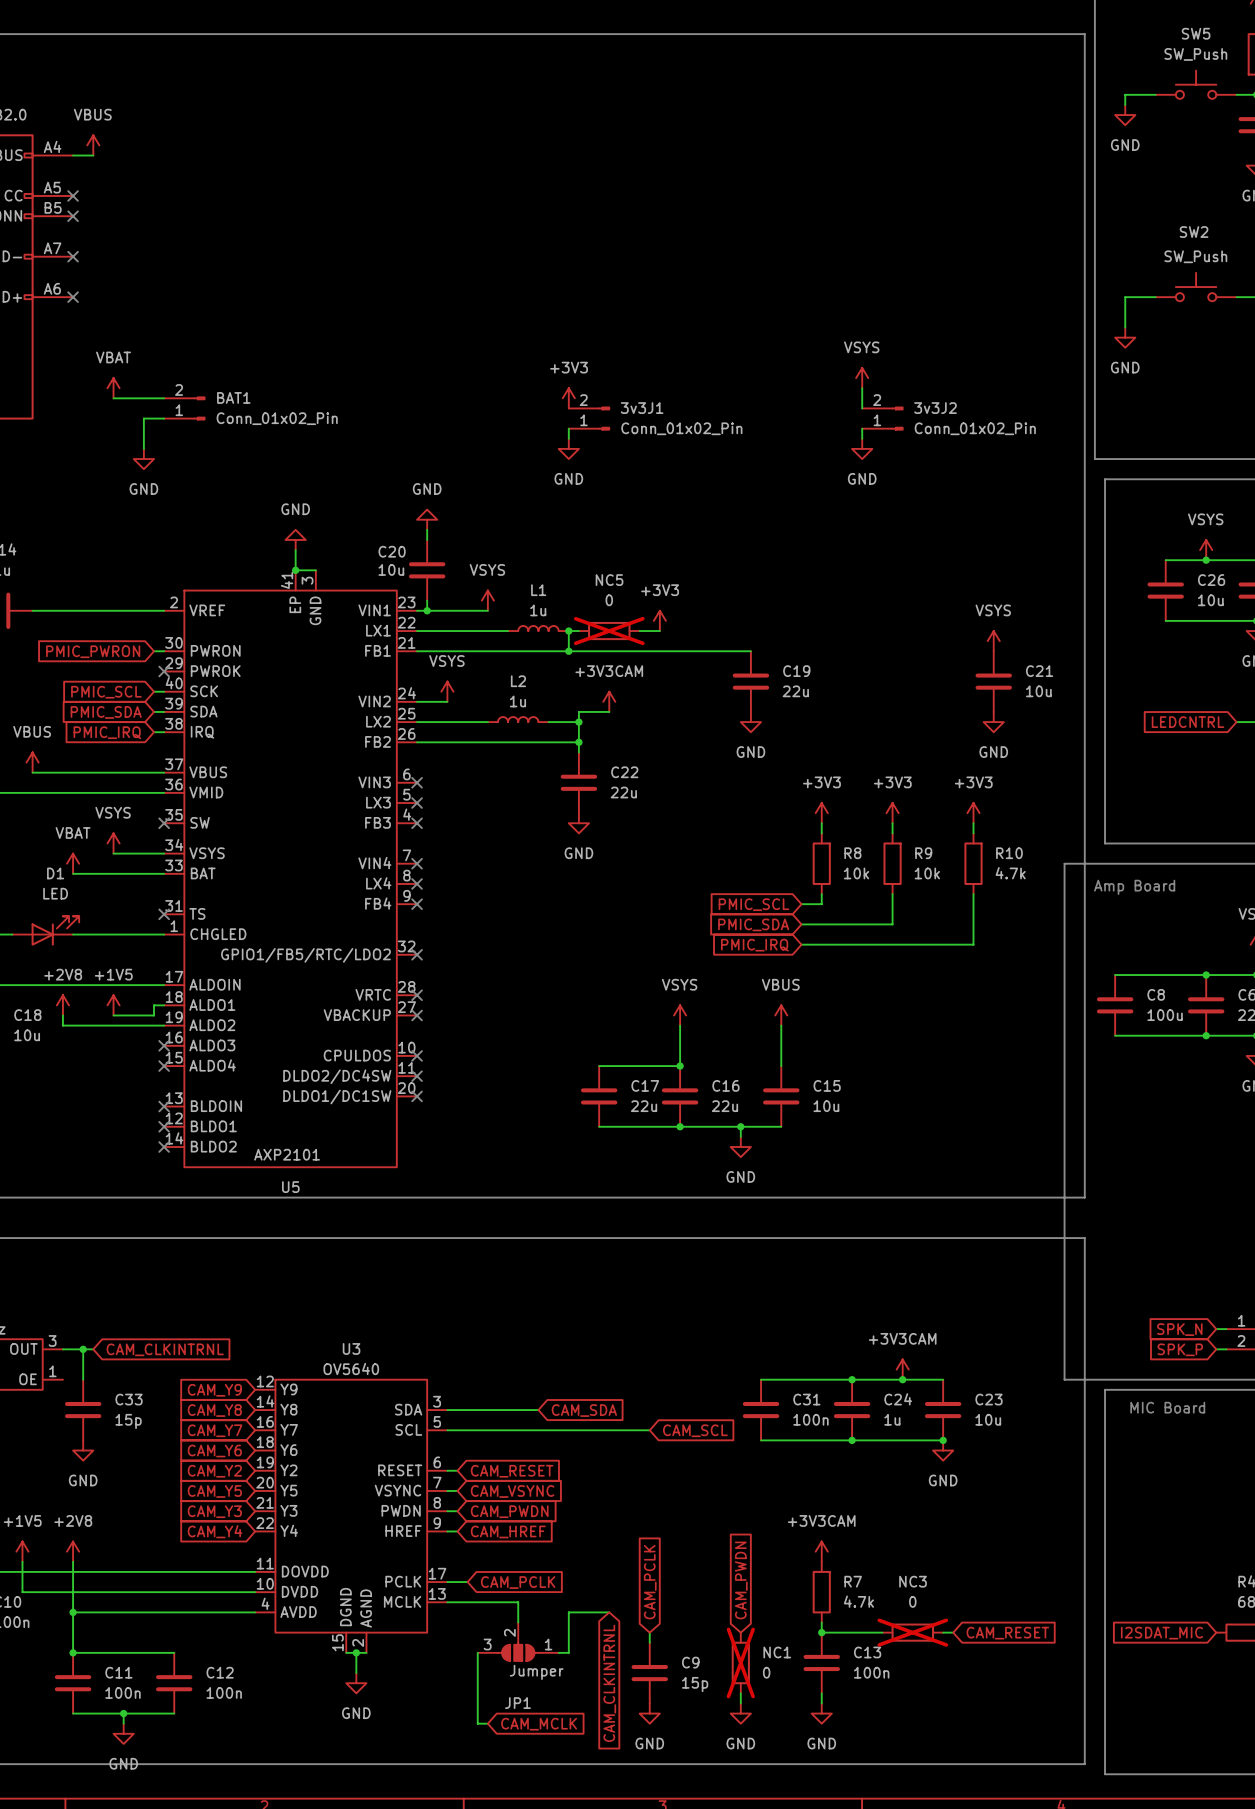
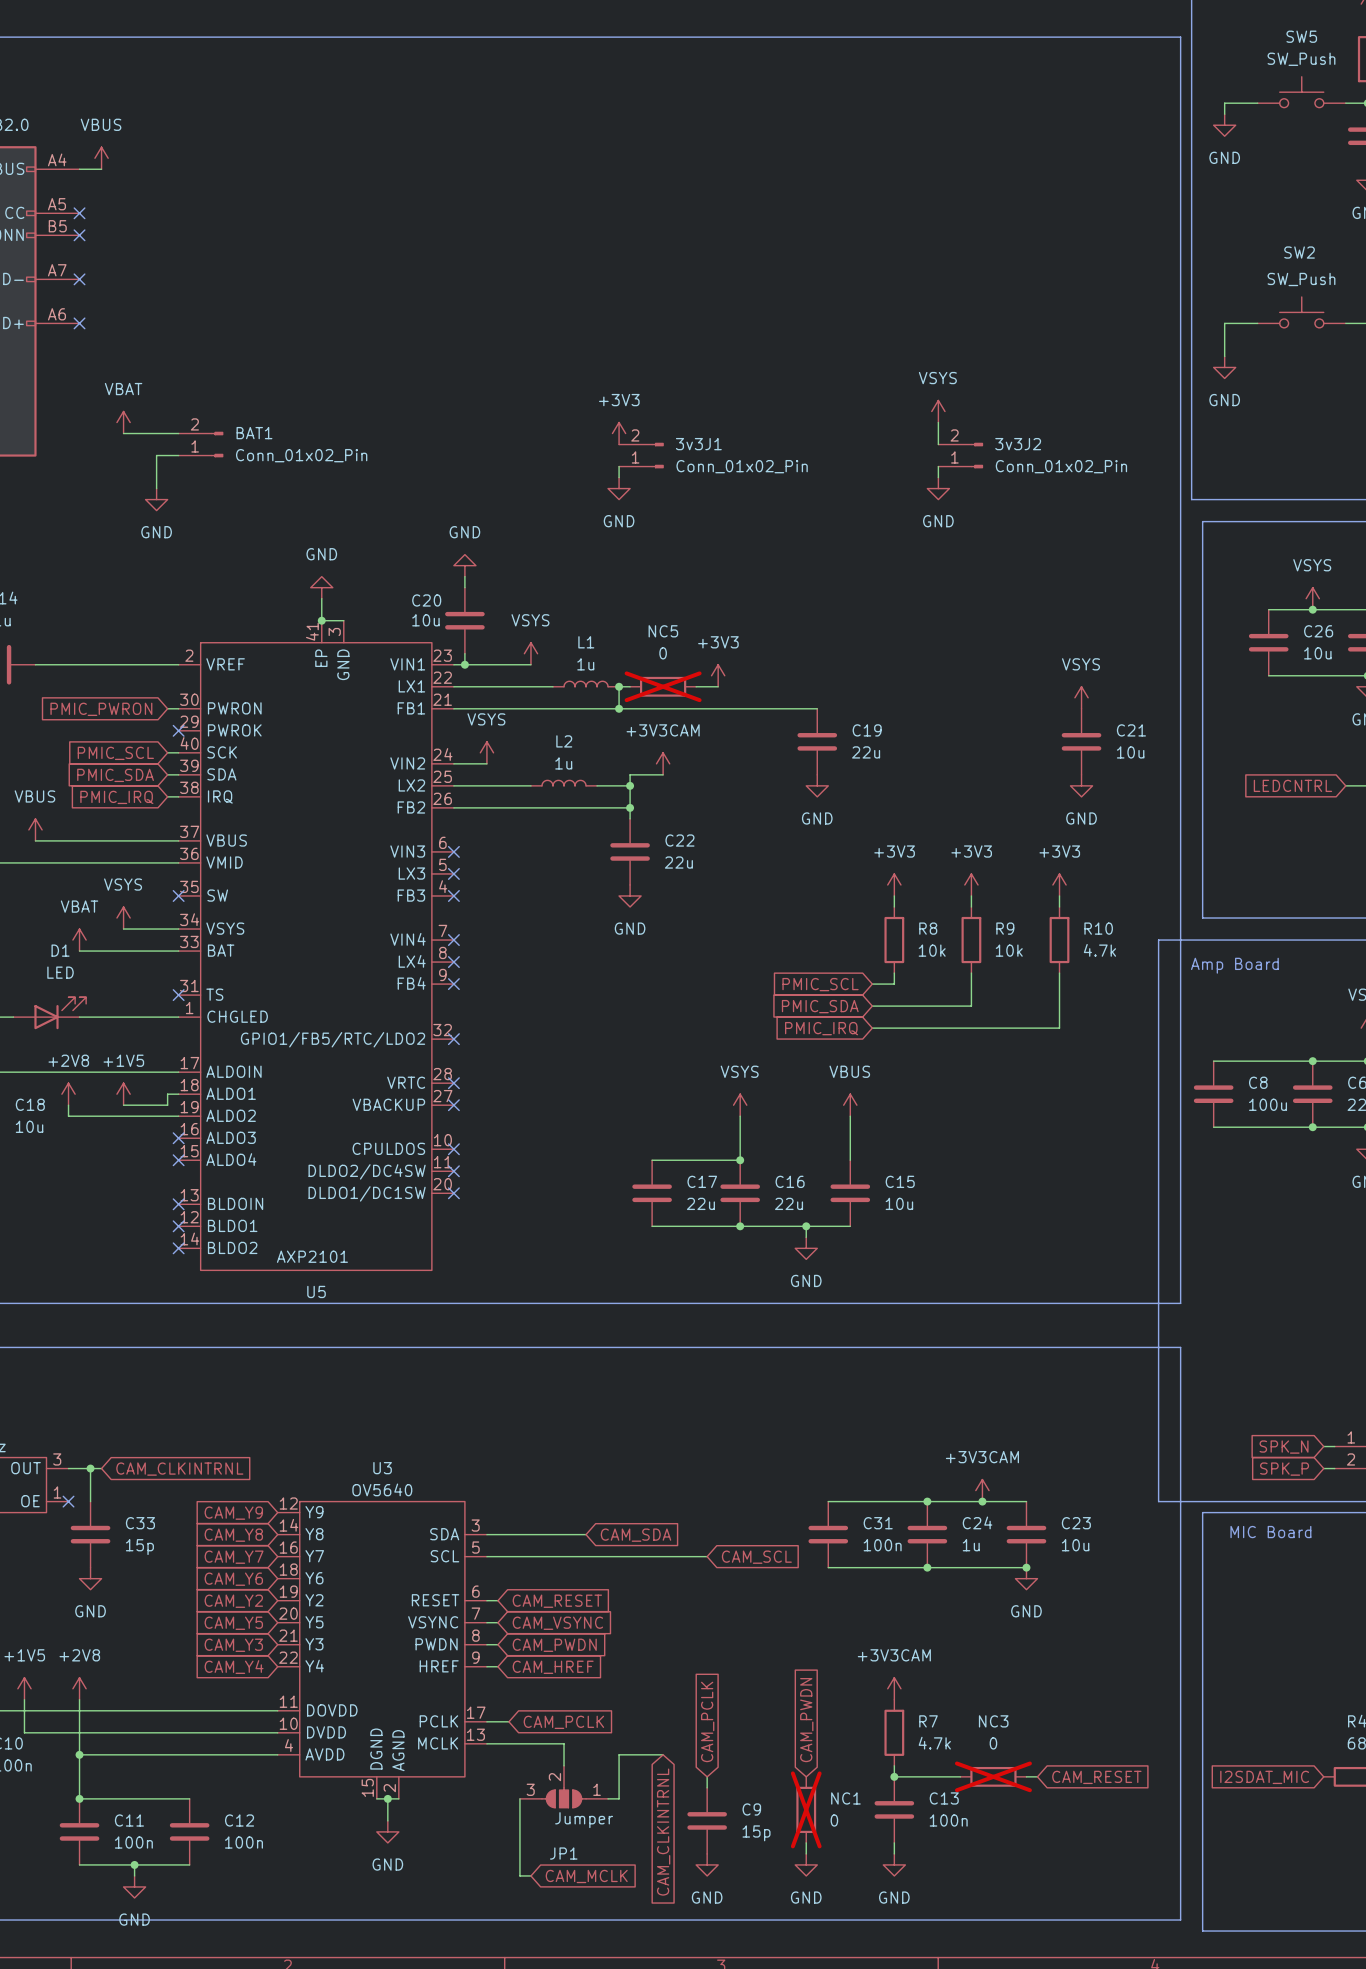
no-connect mark: none -> (68, 1501)

